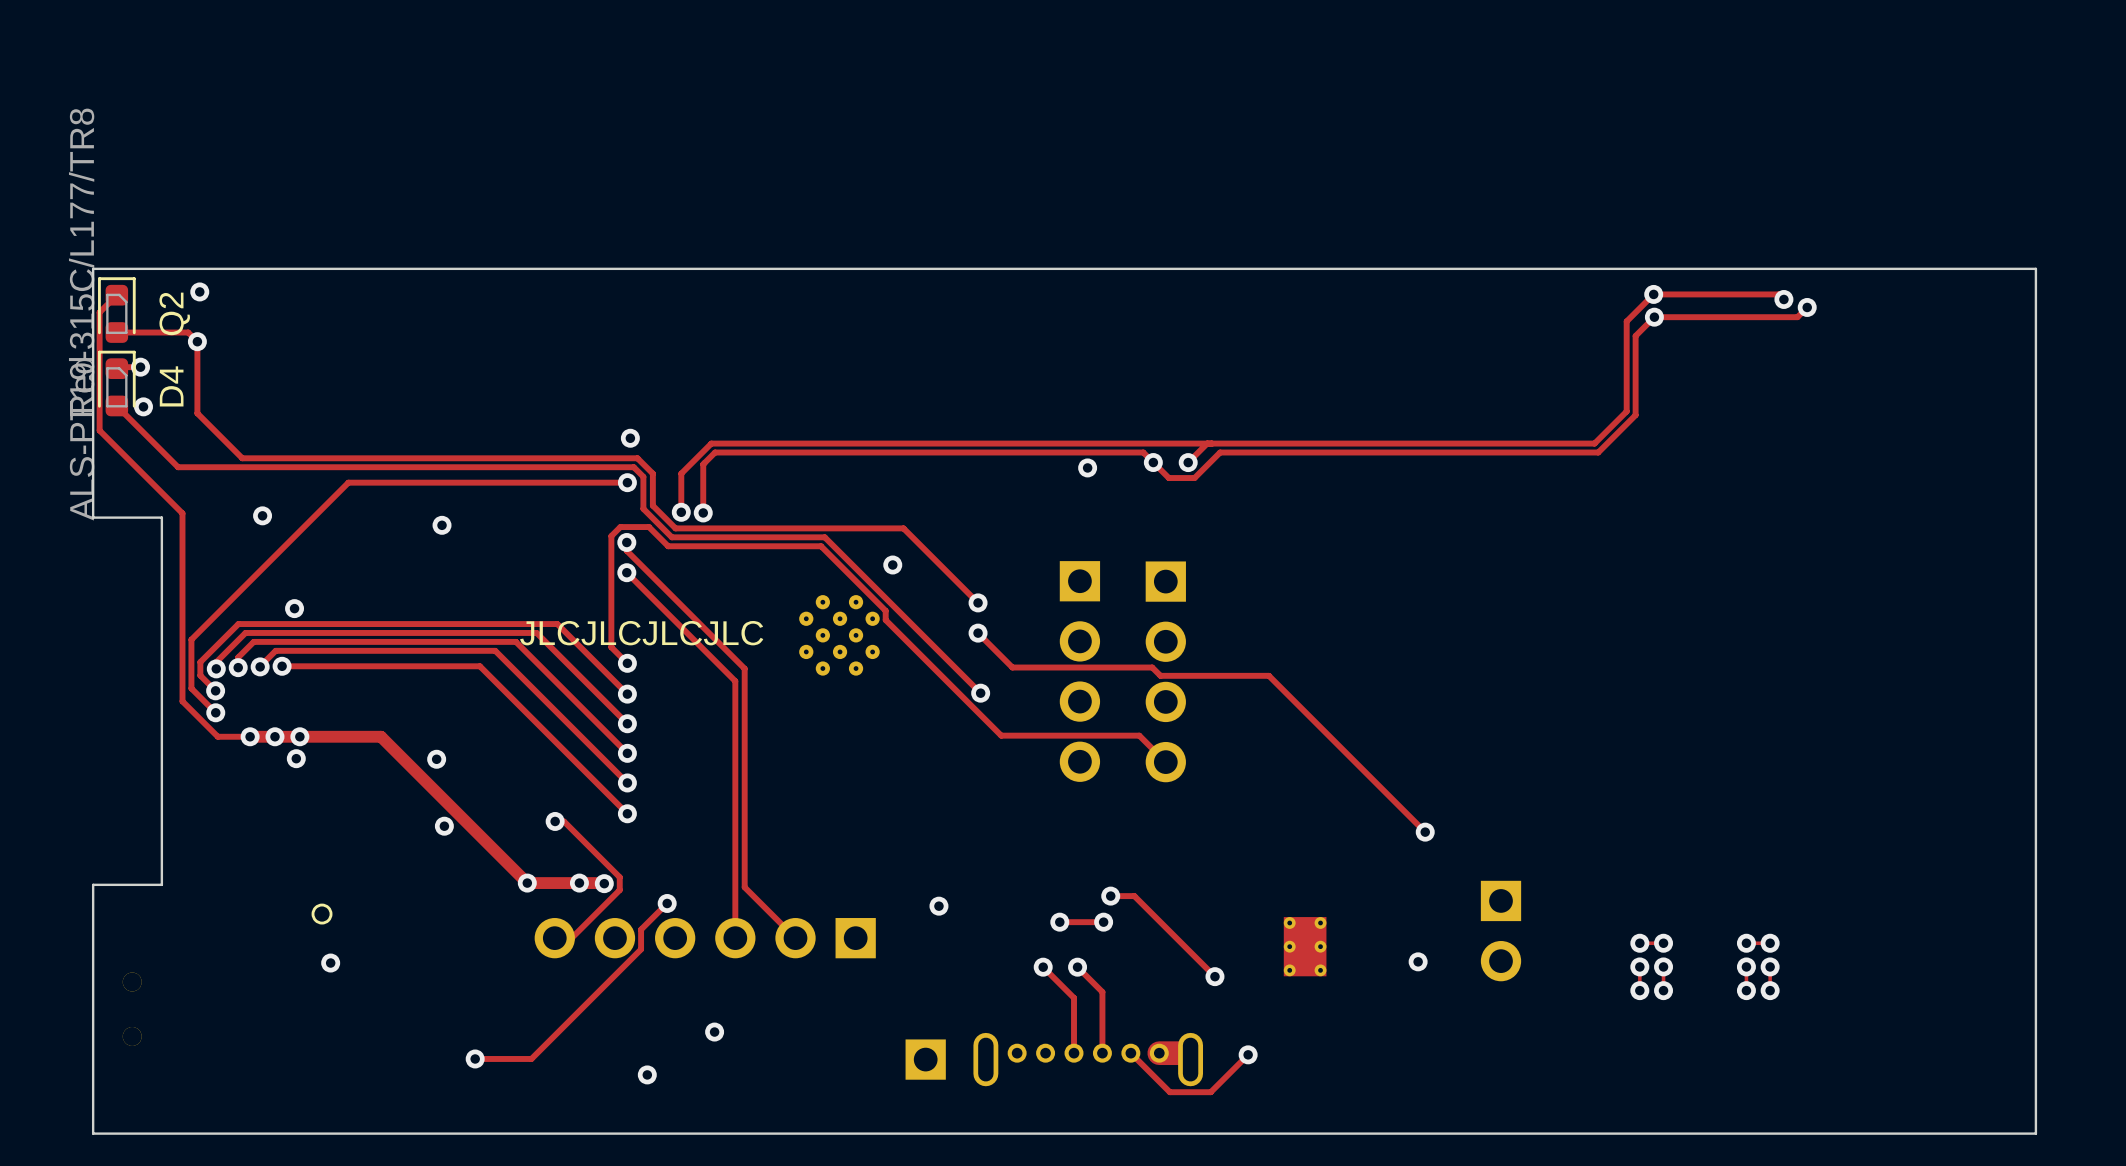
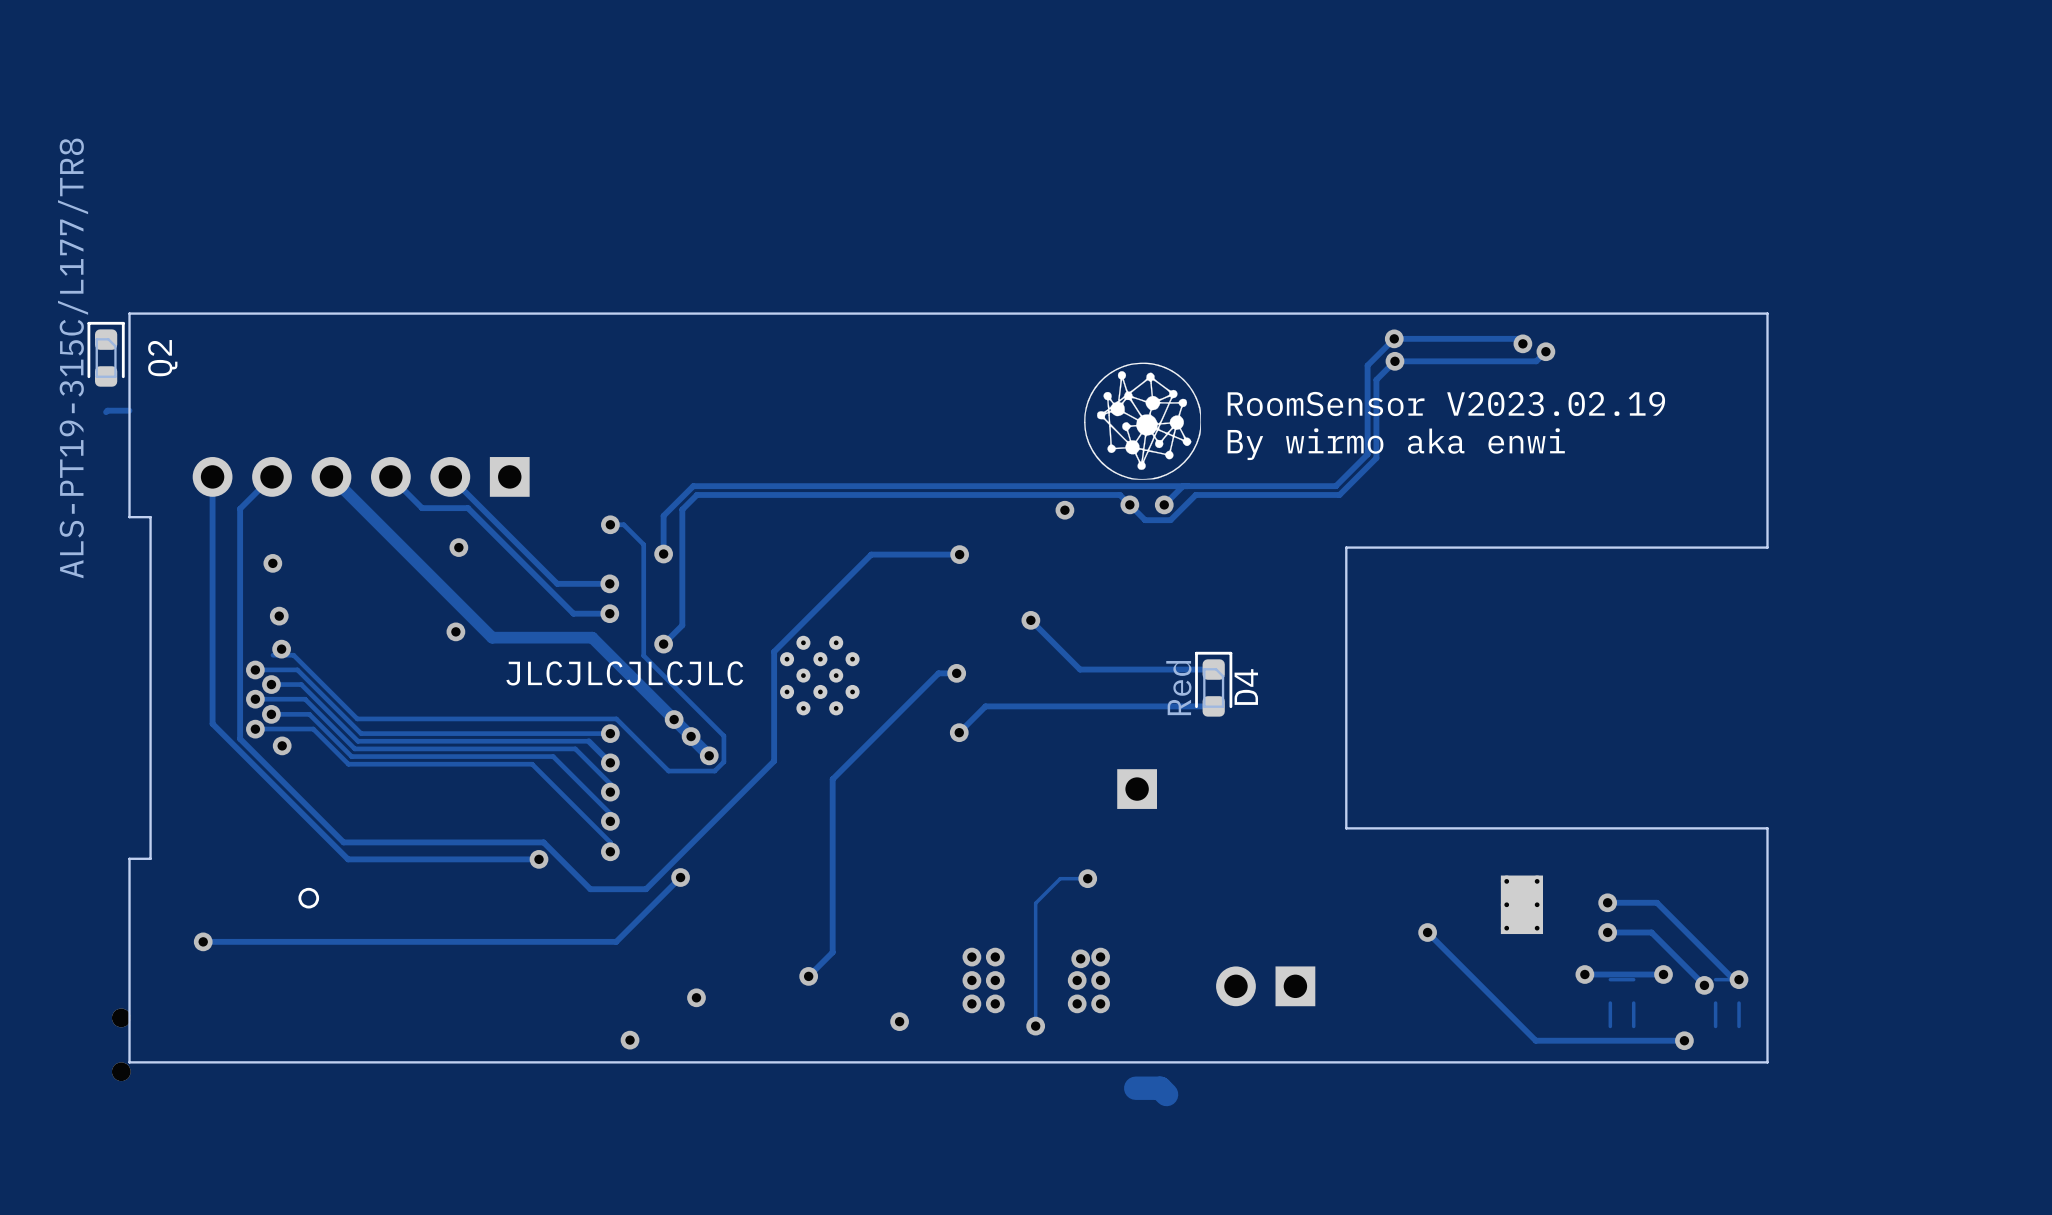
board edge: (140, 268) (93, 268) (93, 517) (161, 517) -> (129, 313) (129, 517) (150, 517) (150, 559)
board edge: (1798, 268) (2035, 268) (2035, 1133) (93, 1133) (93, 884) (161, 884) (161, 820) -> (1767, 313) (1767, 547) (1346, 547) (1346, 828) (1767, 828) (1767, 1062) (129, 1062) (129, 858) (150, 858)
via: (199, 291) -> none
via: none -> (1394, 338)
via: (1653, 294) -> none
track: (116, 295) (99, 312) (99, 430) (182, 513) (182, 701) (217, 736) (381, 736) (527, 883) (604, 883) -> none
via: none -> (1522, 343)
track: (1783, 299) (1778, 294) (1653, 294) (1626, 321) (1626, 411) (1594, 443) (1361, 443) -> (1522, 343) (1517, 338) (1394, 338) (1367, 365) (1367, 454) (1335, 486)
via: (1783, 299) -> none
via: none -> (1545, 351)
track: (1807, 307) (1797, 317) (1654, 317) (1635, 335) (1635, 415) (1598, 452) (1365, 452) -> (1545, 351) (1536, 361) (1394, 361) (1376, 379) (1376, 458) (1339, 494)
via: (1807, 307) -> none
via: none -> (1394, 361)
via: (1654, 317) -> none
drawing: none -> [1084, 362, 1202, 480]
track: (116, 332) (188, 332) (197, 341) (197, 413) (242, 458) (637, 458) (652, 473) (652, 505) (675, 528) (903, 528) (978, 602) -> none
via: (197, 341) -> none
text: none -> RoomSensor V2023.02.19 (1446, 403)
via: (140, 367) -> none
D4 position: (116, 383) -> (1213, 684)
D4 name position: D4 (171, 386) -> D4 (1246, 687)
text: none -> By wirmo aka enwi (1396, 444)
track: (116, 405) (178, 467) (633, 467) (643, 476) (643, 508) (671, 537) (824, 537) (980, 693) -> (1213, 706) (985, 706) (959, 732)
via: (143, 406) -> none
track: none -> (272, 476) (240, 508) (240, 738) (343, 842) (543, 842) (590, 889) (646, 889) (774, 761) (774, 651) (871, 554) (959, 554)
track: none -> (331, 476) (492, 637) (592, 637) (709, 755)
part: none -> (361, 476)
via: (630, 438) -> none
track: (703, 464) (703, 512) -> (685, 506) (682, 509) (682, 625) (663, 644)
track: (627, 482) (348, 482) (191, 639) (191, 688) (215, 712) -> (610, 524) (623, 524) (643, 544) (643, 655) (723, 735) (723, 761) (714, 771) (668, 771) (616, 718) (357, 718) (293, 655) (272, 655)
via: none -> (458, 547)
via: (703, 512) -> none
via: none -> (959, 554)
via position: (262, 515) -> (272, 563)
via: (442, 525) -> none
track: (626, 542) (626, 550) (744, 668) (744, 887) (795, 938) -> (609, 583) (557, 583) (450, 476)
via: (892, 565) -> none
track: (626, 572) (735, 681) (735, 938) -> (609, 613) (573, 613) (467, 508) (422, 508) (390, 476)
via: none -> (279, 616)
track: none -> (1030, 620) (1080, 669) (1213, 669)
via: none -> (1030, 620)
via: none -> (455, 631)
via: (978, 602) -> none
via: none -> (663, 644)
via: none -> (255, 669)
track: (978, 633) (1012, 667) (1152, 667) (1160, 675) (1268, 675) (1425, 832) -> (956, 673) (938, 673) (832, 779) (832, 952) (808, 976)
via: none -> (271, 684)
via: none -> (255, 699)
track: (627, 663) (611, 647) (611, 536) (620, 527) (648, 527) (668, 546) (821, 546) (885, 610) (885, 620) (1001, 735) (1139, 735) (1165, 762) -> none
via: (627, 663) -> none
track: (260, 666) (275, 650) (495, 650) (627, 782) -> (271, 714) (309, 714) (351, 756) (553, 756) (610, 813) (610, 821)
via: (260, 666) -> none
track: (282, 666) (479, 666) (627, 813) -> (255, 729) (313, 729) (348, 764) (532, 764) (610, 842) (610, 851)
via: (282, 666) -> none
track: (238, 667) (238, 657) (253, 641) (515, 641) (627, 753) -> (255, 699) (305, 699) (354, 748) (575, 748) (610, 783) (610, 792)
via: (238, 667) -> none
track: (216, 668) (216, 662) (245, 632) (536, 632) (605, 701) -> (271, 684) (301, 684) (358, 741) (588, 741)
via: (216, 668) -> none
part: (1079, 671) -> none
part: (1165, 671) -> none
via: none -> (271, 714)
via: none -> (674, 719)
via: none -> (255, 729)
track: (215, 690) (200, 675) (200, 662) (238, 624) (557, 624) (627, 694) -> (255, 669) (297, 669) (361, 733) (610, 733)
via: (215, 690) -> none
via: none -> (691, 736)
via: none -> (282, 745)
via: (215, 712) -> none
via: none -> (709, 755)
via: (250, 736) -> none
via: (274, 736) -> none
via: (299, 736) -> none
via: (296, 758) -> none
via: (436, 759) -> none
track: (555, 821) (563, 821) (619, 877) (619, 890) (571, 938) (554, 938) -> (539, 859) (348, 859) (212, 723) (212, 476)
via: (444, 826) -> none
via: (1425, 832) -> none
track: none -> (680, 877) (616, 941) (203, 941)
via: none -> (680, 877)
track: none -> (1087, 878) (1060, 878) (1035, 903) (1035, 1026)
via: none -> (1087, 878)
track: none -> (1607, 902) (1656, 902) (1738, 984)
via: none -> (1607, 902)
part: none -> (1521, 904)
via: (527, 883) -> none
via: (579, 883) -> none
via: (604, 883) -> none
track: none -> (1427, 932) (1535, 1040) (1684, 1040)
via: none -> (1427, 932)
track: none -> (1607, 932) (1651, 932) (1704, 985)
via: none -> (1607, 932)
track: (1110, 896) (1134, 896) (1214, 976) -> none
via: (1110, 896) -> none
track: (667, 903) (641, 929) (641, 949) (531, 1058) (475, 1058) -> none
via: (667, 903) -> none
via: none -> (203, 941)
via: (938, 906) -> none
part position: (322, 914) -> (308, 898)
part footprint: [1283, 917, 1327, 977] -> [1216, 966, 1316, 1007]
via: none -> (971, 957)
via: none -> (995, 957)
via: none -> (1100, 957)
track: (1059, 922) (1103, 922) -> none
via: (1059, 922) -> none
part: (1501, 931) -> none
part: (705, 938) -> none
track: none -> (1584, 974) (1663, 974)
via: none -> (1584, 974)
via: none -> (1663, 974)
via: none -> (808, 976)
via: (1639, 943) -> none
via: (1663, 943) -> none
via: (1746, 943) -> none
via: none -> (971, 980)
via: none -> (995, 980)
via: none -> (1077, 980)
via: none -> (1100, 980)
via: none -> (1704, 985)
via: none -> (696, 997)
via: (1418, 961) -> none
via: (330, 963) -> none
via: (1639, 966) -> none
via: (1663, 966) -> none
via: (1746, 966) -> none
via: (1770, 966) -> none
via: none -> (971, 1003)
via: none -> (995, 1003)
track: (1043, 967) (1074, 997) (1074, 1053) -> none
via: (1043, 967) -> none
track: (1077, 967) (1102, 992) (1102, 1053) -> none
via: (1077, 967) -> none
via: none -> (1077, 1003)
via: none -> (1100, 1003)
via: (1214, 976) -> none
via: none -> (899, 1021)
via: none -> (1035, 1026)
via: (1639, 990) -> none
via: (1663, 990) -> none
via: (1746, 990) -> none
via: (1770, 990) -> none
via: none -> (630, 1040)
via: none -> (1684, 1040)
via: (714, 1032) -> none
track: (1130, 1053) (1169, 1092) (1210, 1092) (1248, 1054) -> none
via: (1248, 1054) -> none
via: (475, 1058) -> none
part position: (925, 1059) -> (1137, 789)
part: (1088, 1059) -> none
via: (647, 1074) -> none

